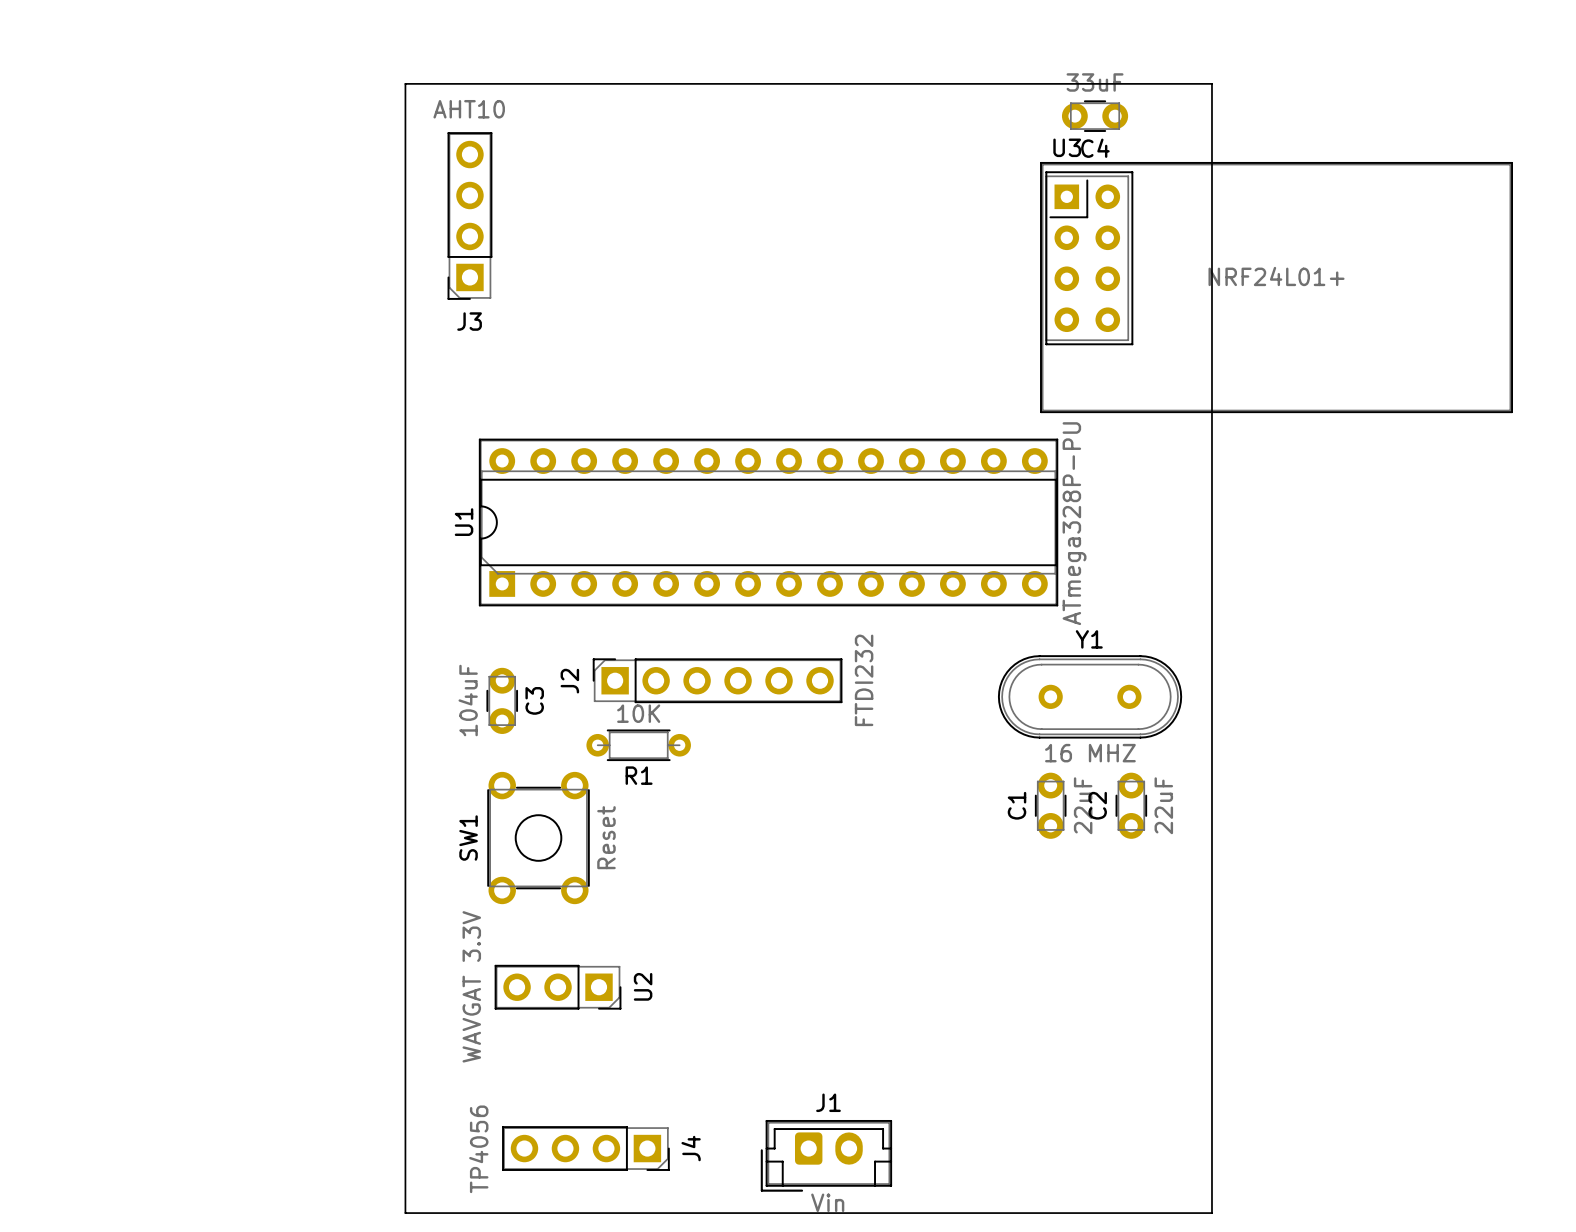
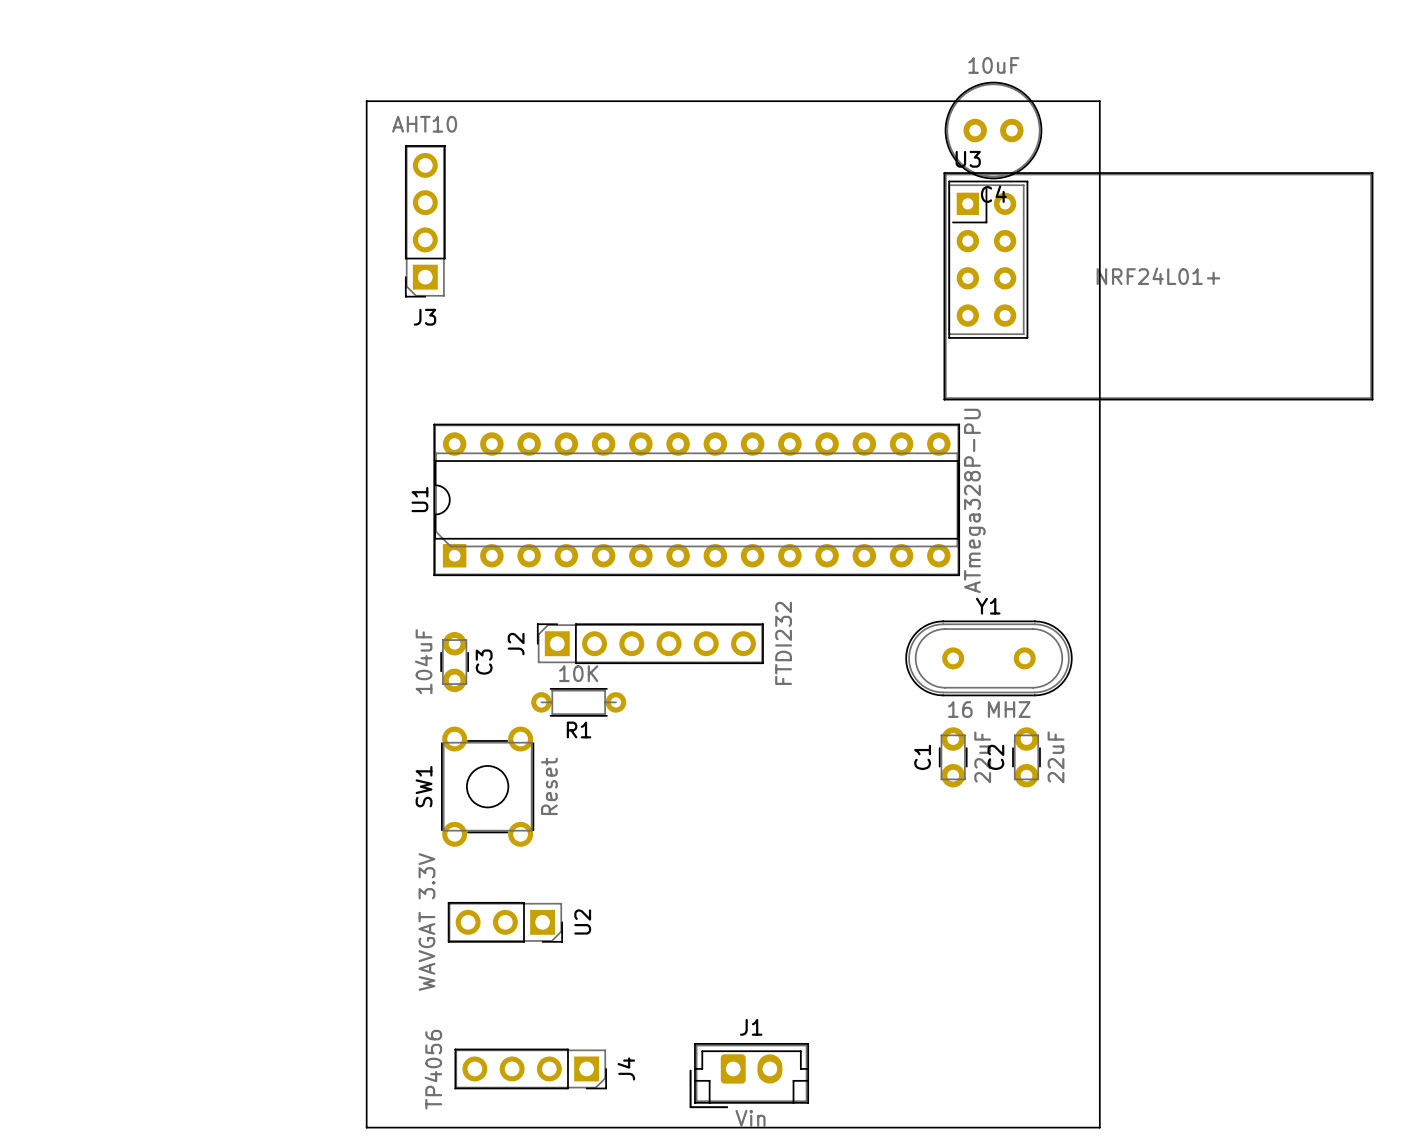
C4 value: 33uF (1095, 82) -> 10uF (993, 65)
C4 footprint: [1061, 100, 1129, 132] -> [944, 81, 1043, 180]
C4 name position: C4 (1095, 148) -> C4 (993, 194)

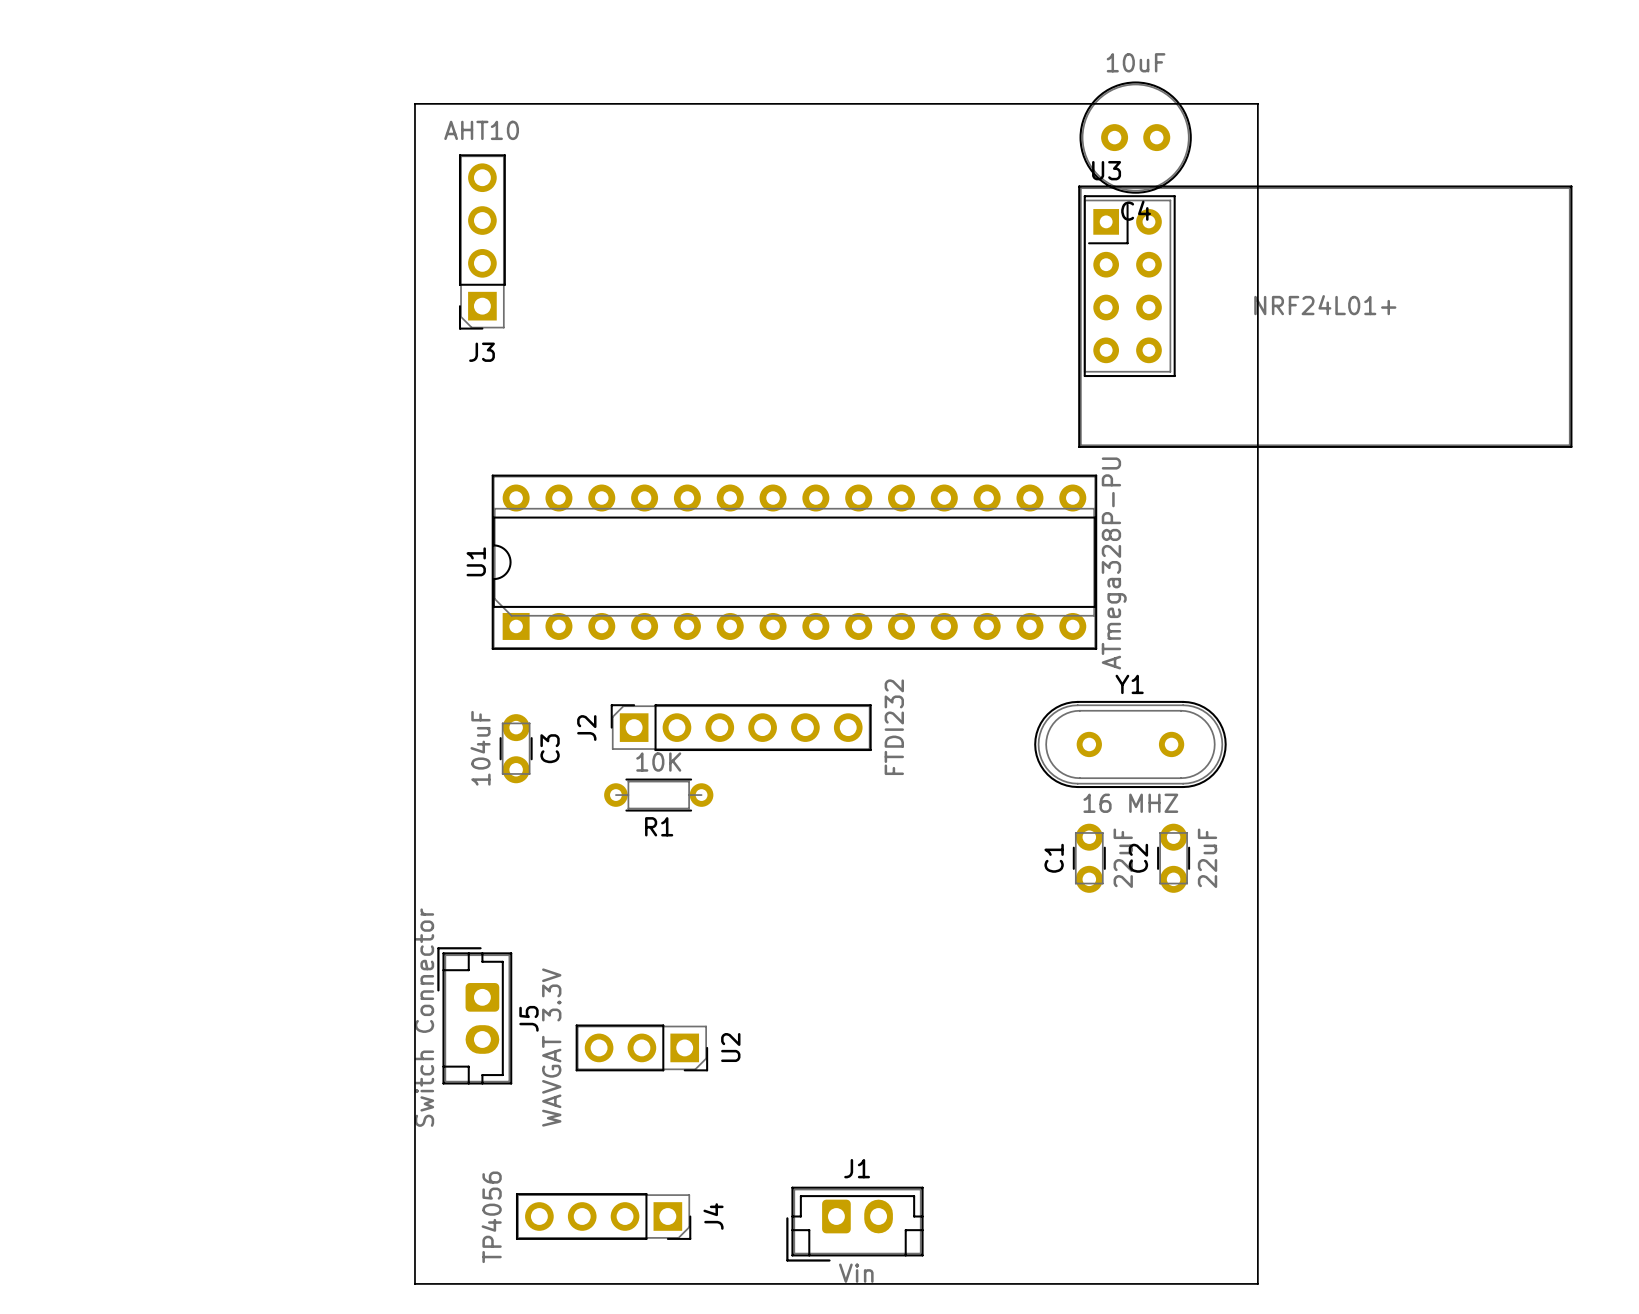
SW1: Reset (487, 786) -> none
J5: none -> Switch Connector (474, 1015)
U2 position: (505, 922) -> (641, 1047)

